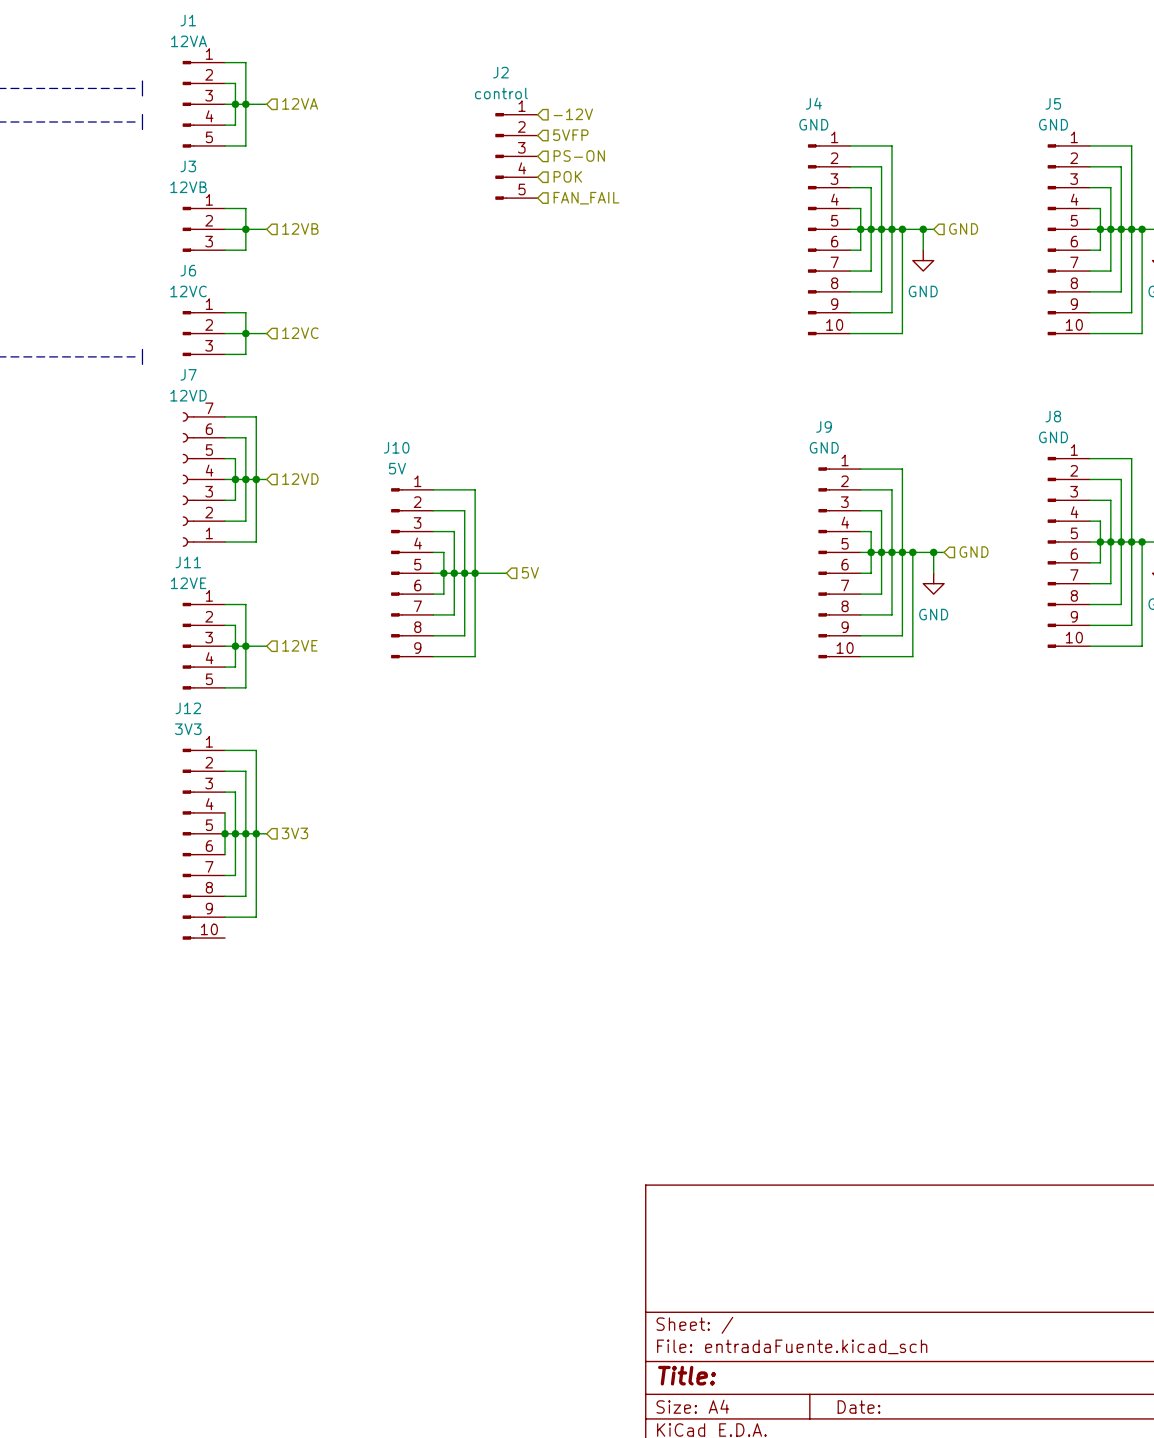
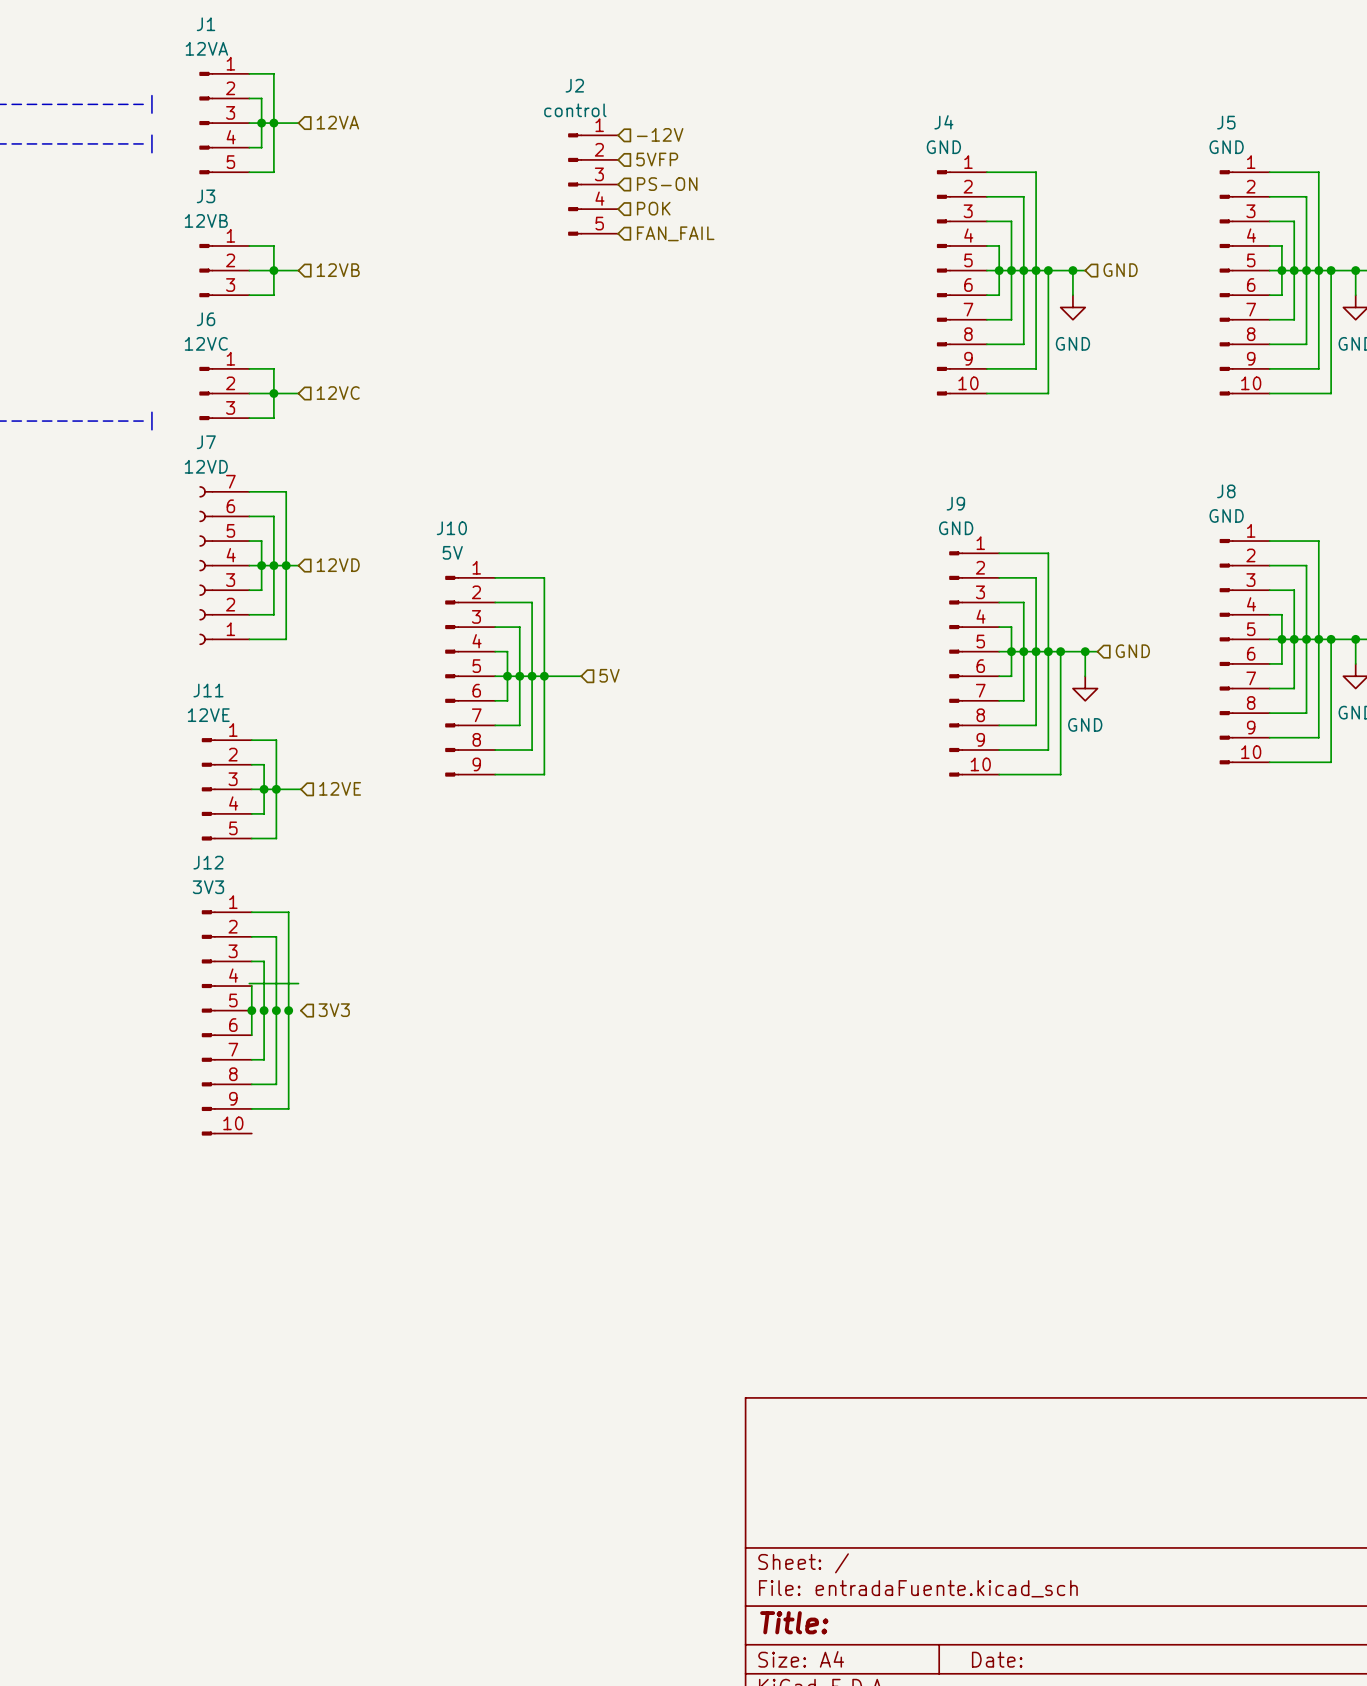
wire: (225, 604) (245, 604) (245, 687) (225, 687) -> (251, 740) (276, 740) (276, 838) (251, 838)
wire: (225, 625) (235, 625) (235, 667) (225, 667) -> (251, 764) (264, 764) (264, 813) (251, 813)
hierarchical label position: 12VE (299, 645) -> 12VE (340, 788)
J11 position: (203, 646) -> (226, 789)
wire: (225, 646) (266, 646) -> (251, 789) (300, 789)
junction: (235, 646) -> none
junction: (245, 646) -> none
junction: none -> (264, 789)
junction: none -> (276, 789)
wire: (225, 750) (256, 750) (256, 917) (225, 917) -> (251, 912) (288, 912) (288, 1108) (251, 1108)
wire: (225, 771) (245, 771) (245, 896) (225, 896) -> (251, 936) (276, 936) (276, 1084) (251, 1084)
wire: (225, 792) (235, 792) (235, 875) (225, 875) -> (251, 961) (264, 961) (264, 1059) (251, 1059)
wire: (225, 812) (225, 854) -> (251, 986) (251, 1035)
junction: (225, 833) -> none
junction: (235, 833) -> none
junction: (245, 833) -> none
junction: (256, 833) -> none
hierarchical label position: 3V3 (294, 833) -> 3V3 (334, 1010)
J12 position: (203, 844) -> (226, 1022)
junction: none -> (251, 1010)
junction: none -> (264, 1010)
junction: none -> (276, 1010)
junction: none -> (288, 1010)

